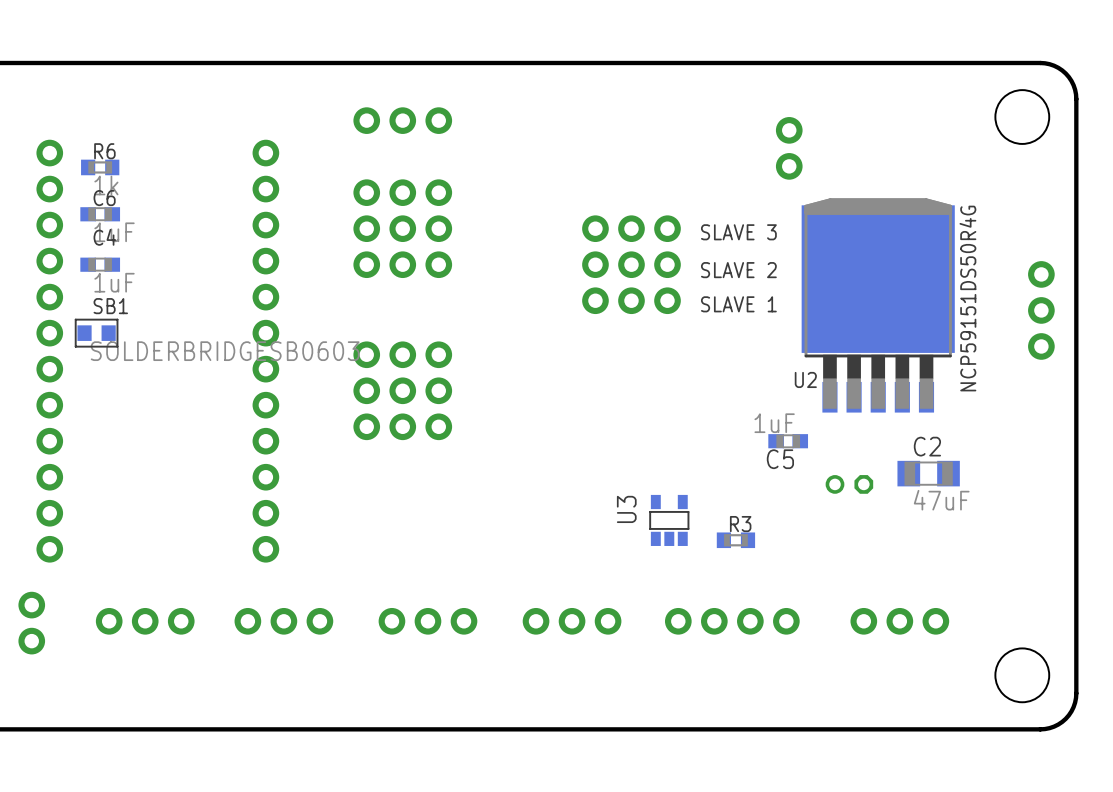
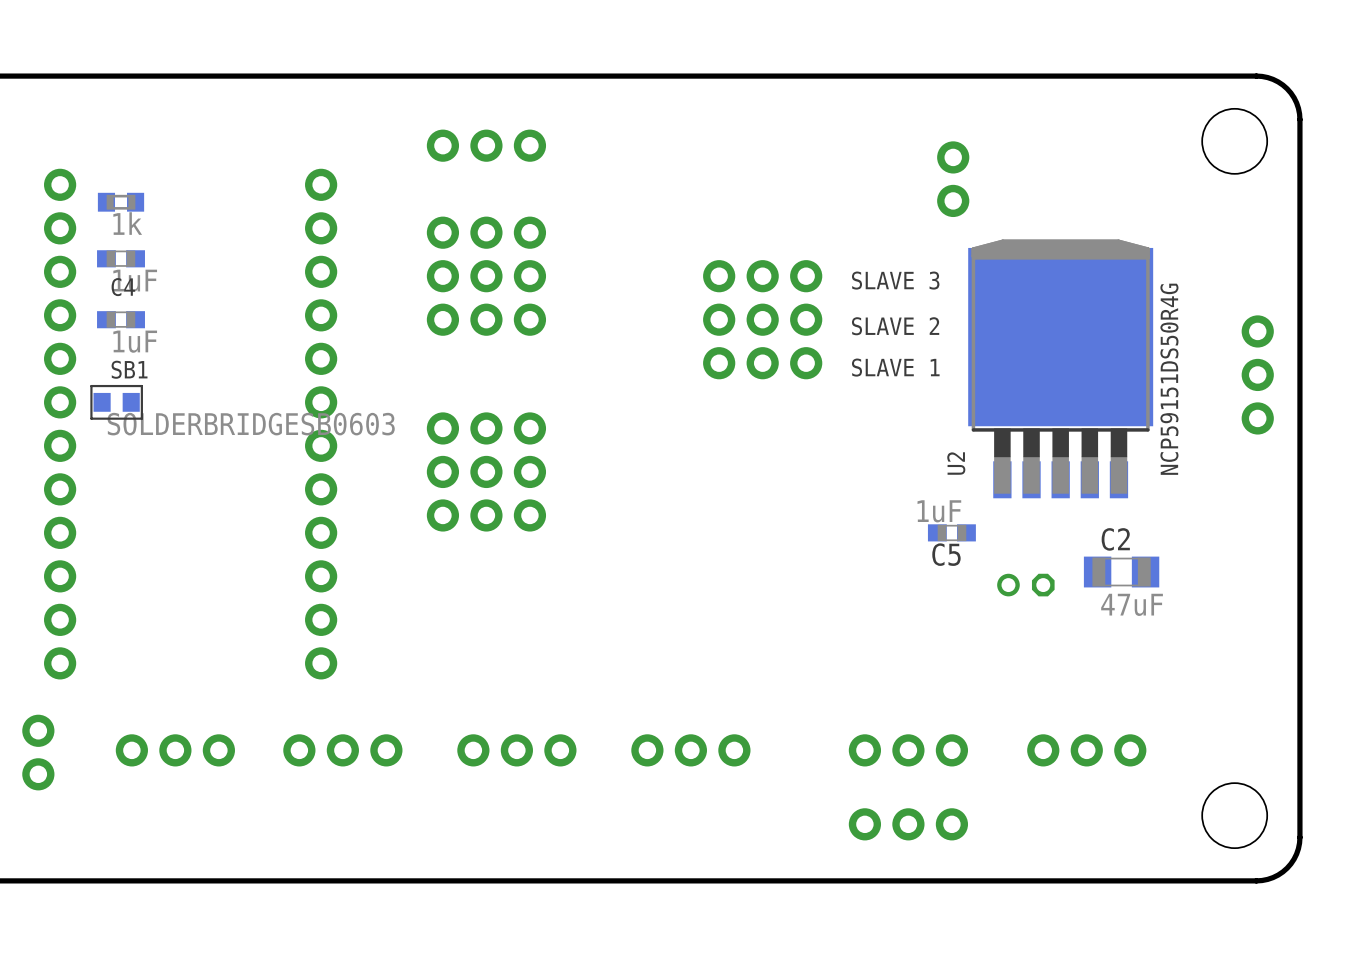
R6 name: R6 (104, 151) -> none
C6 name: C6 (104, 198) -> none
U2 name rotation: 0° (805, 379) -> 90° counterclockwise (956, 463)
U3: (669, 520) -> none
R3: (735, 540) -> none
part: (732, 621) -> none
part: none -> (908, 750)
part: none -> (908, 824)

